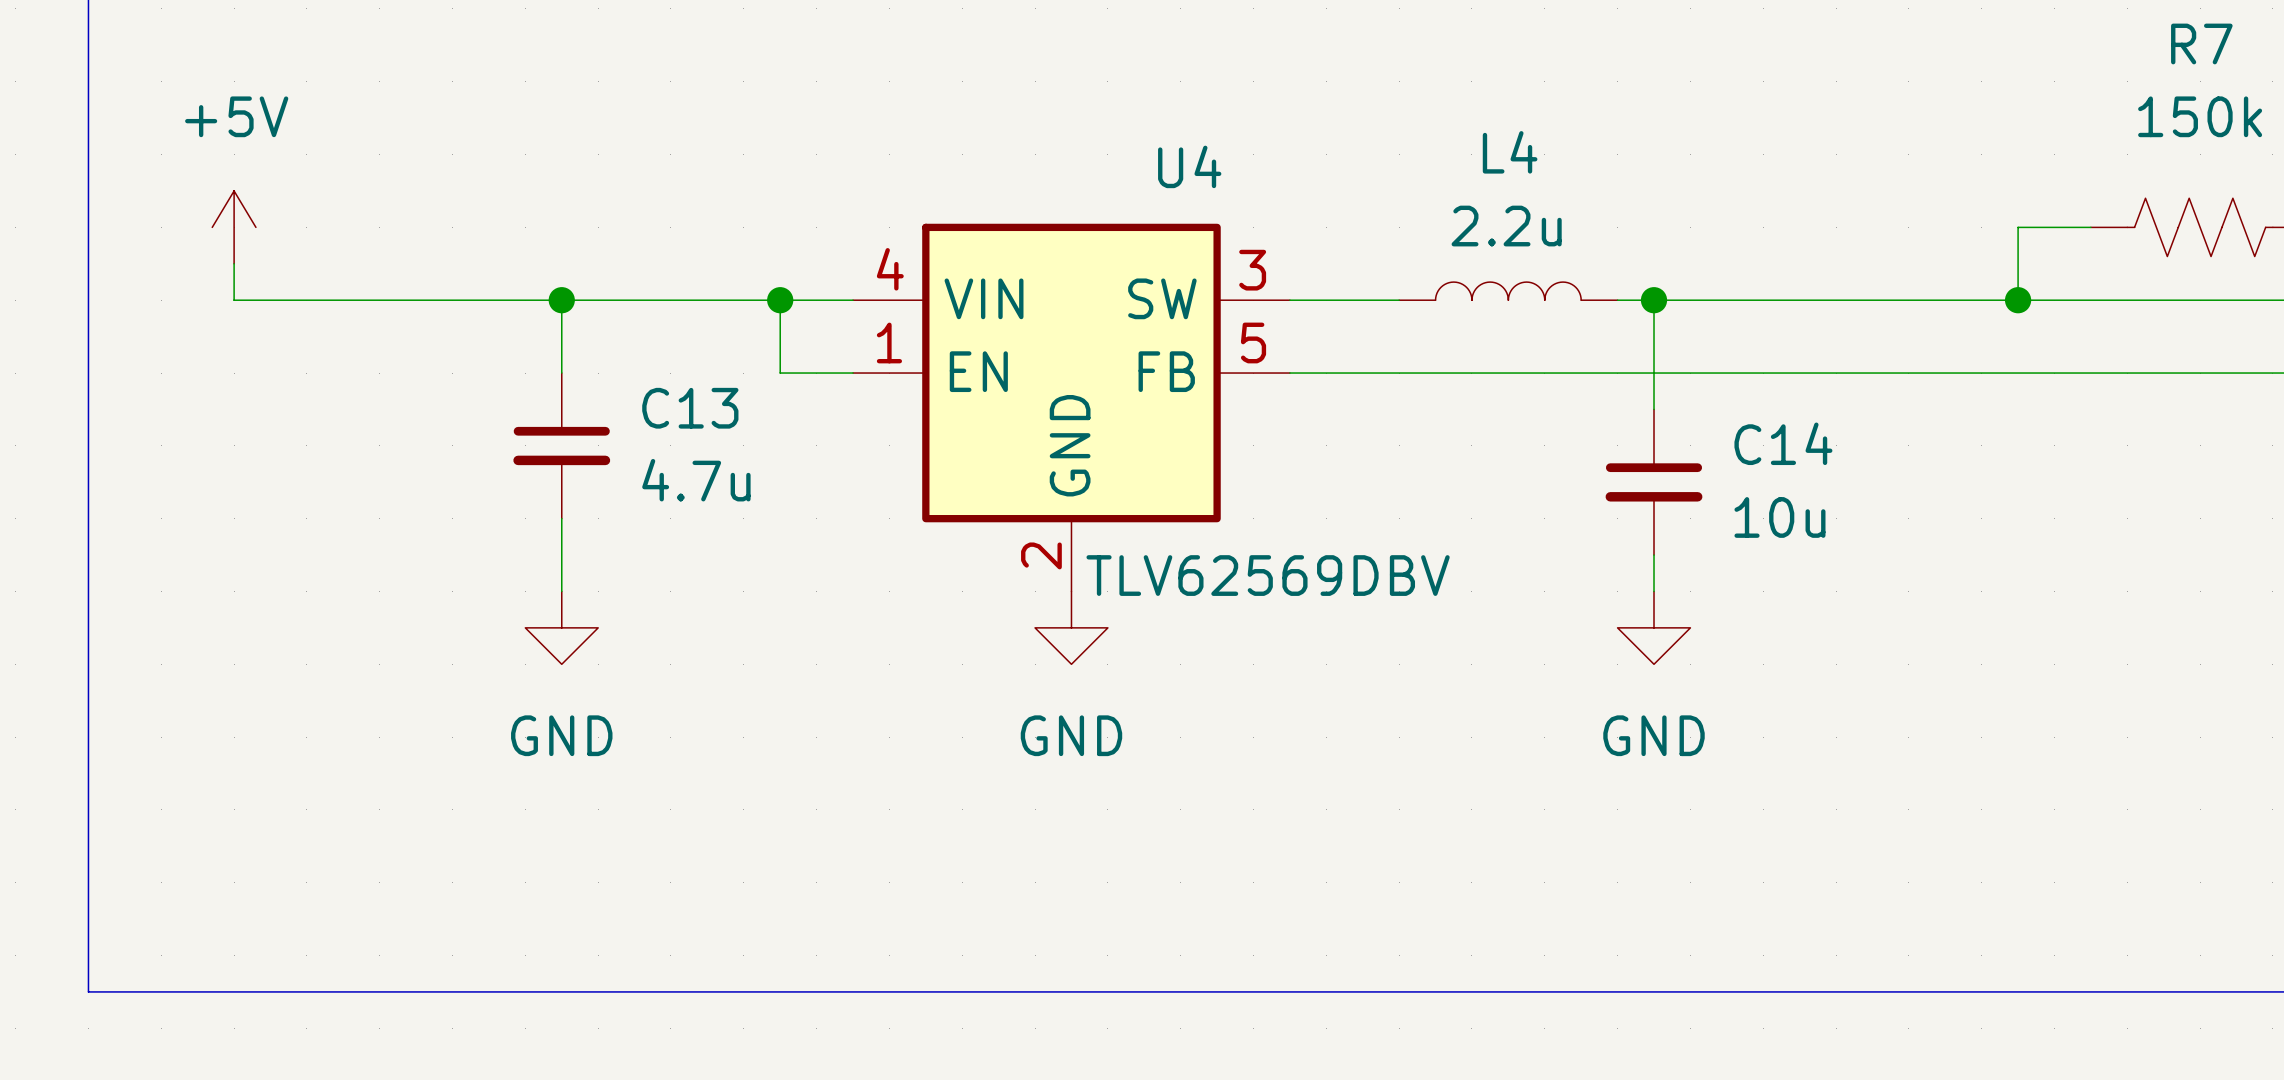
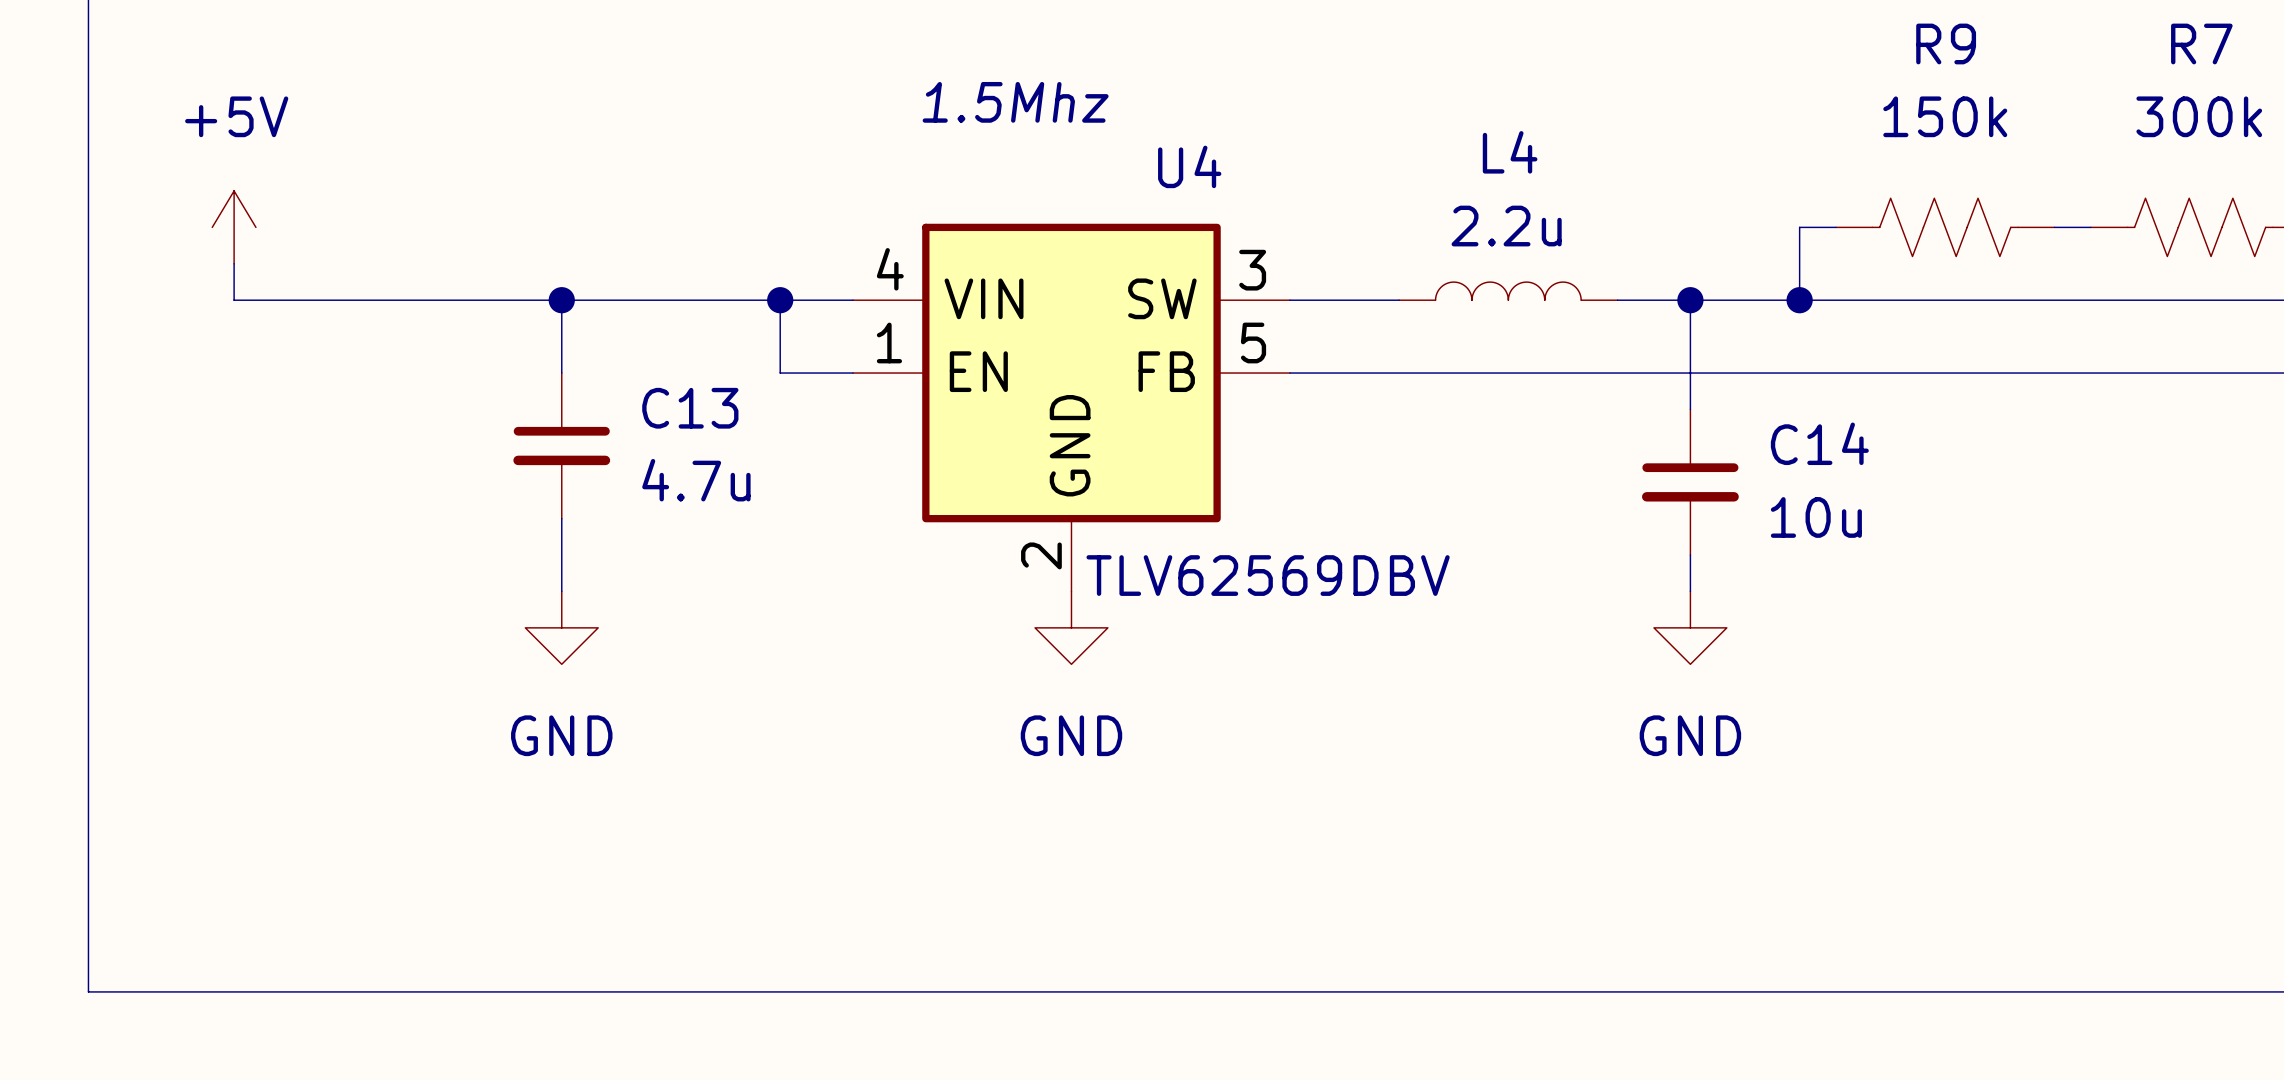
text: none -> 1.5Mhz (1015, 102)
R7 value: 150k (2200, 116) -> 300k (2199, 116)
R9: none -> 150k (1945, 227)
wire: (2054, 227) (2018, 227) (2018, 300) -> (1836, 227) (1799, 227) (1799, 300)
wire: (1654, 300) (1654, 409) -> (1690, 300) (1690, 409)
junction position: (1654, 300) -> (1690, 300)
junction: none -> (1799, 300)
junction: (2018, 300) -> none
C14 position: (1654, 482) -> (1690, 482)
wire: (1654, 555) (1654, 591) -> (1690, 555) (1690, 591)
power symbol position: GND (1654, 627) -> GND (1690, 627)

